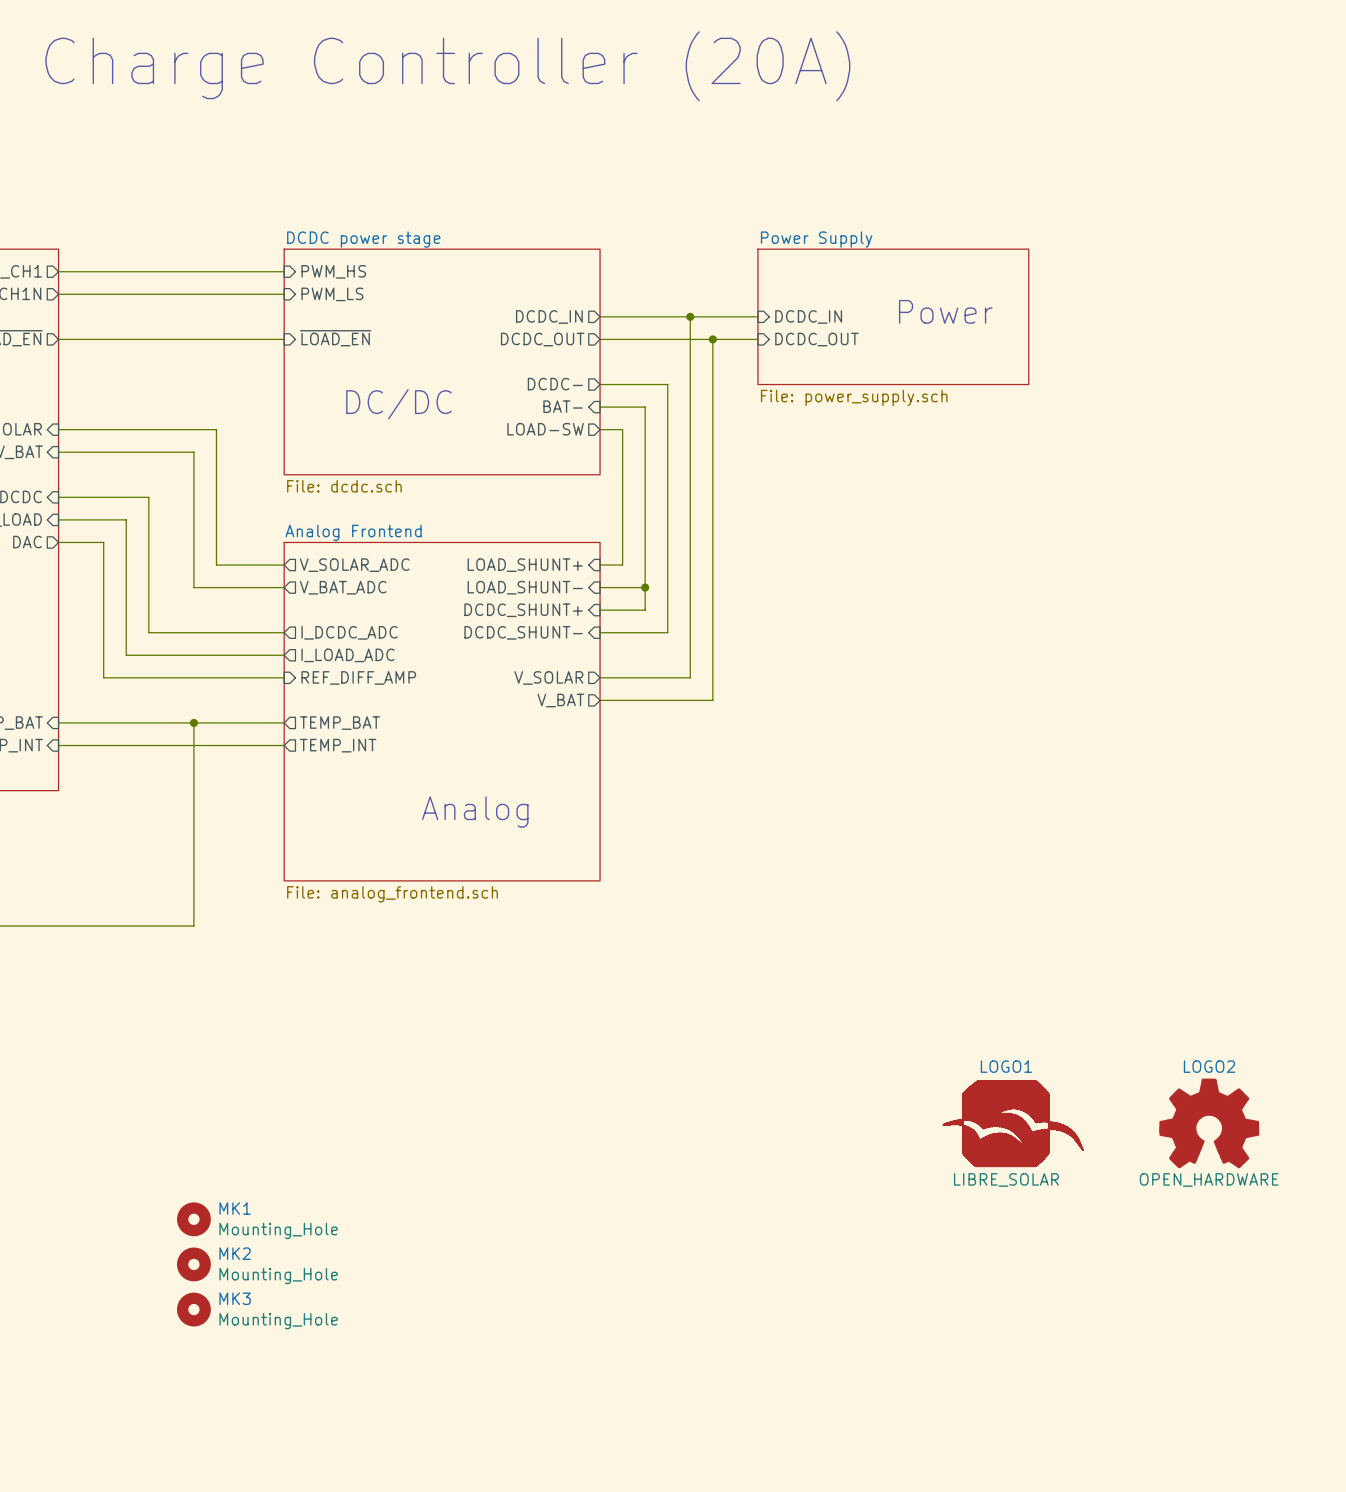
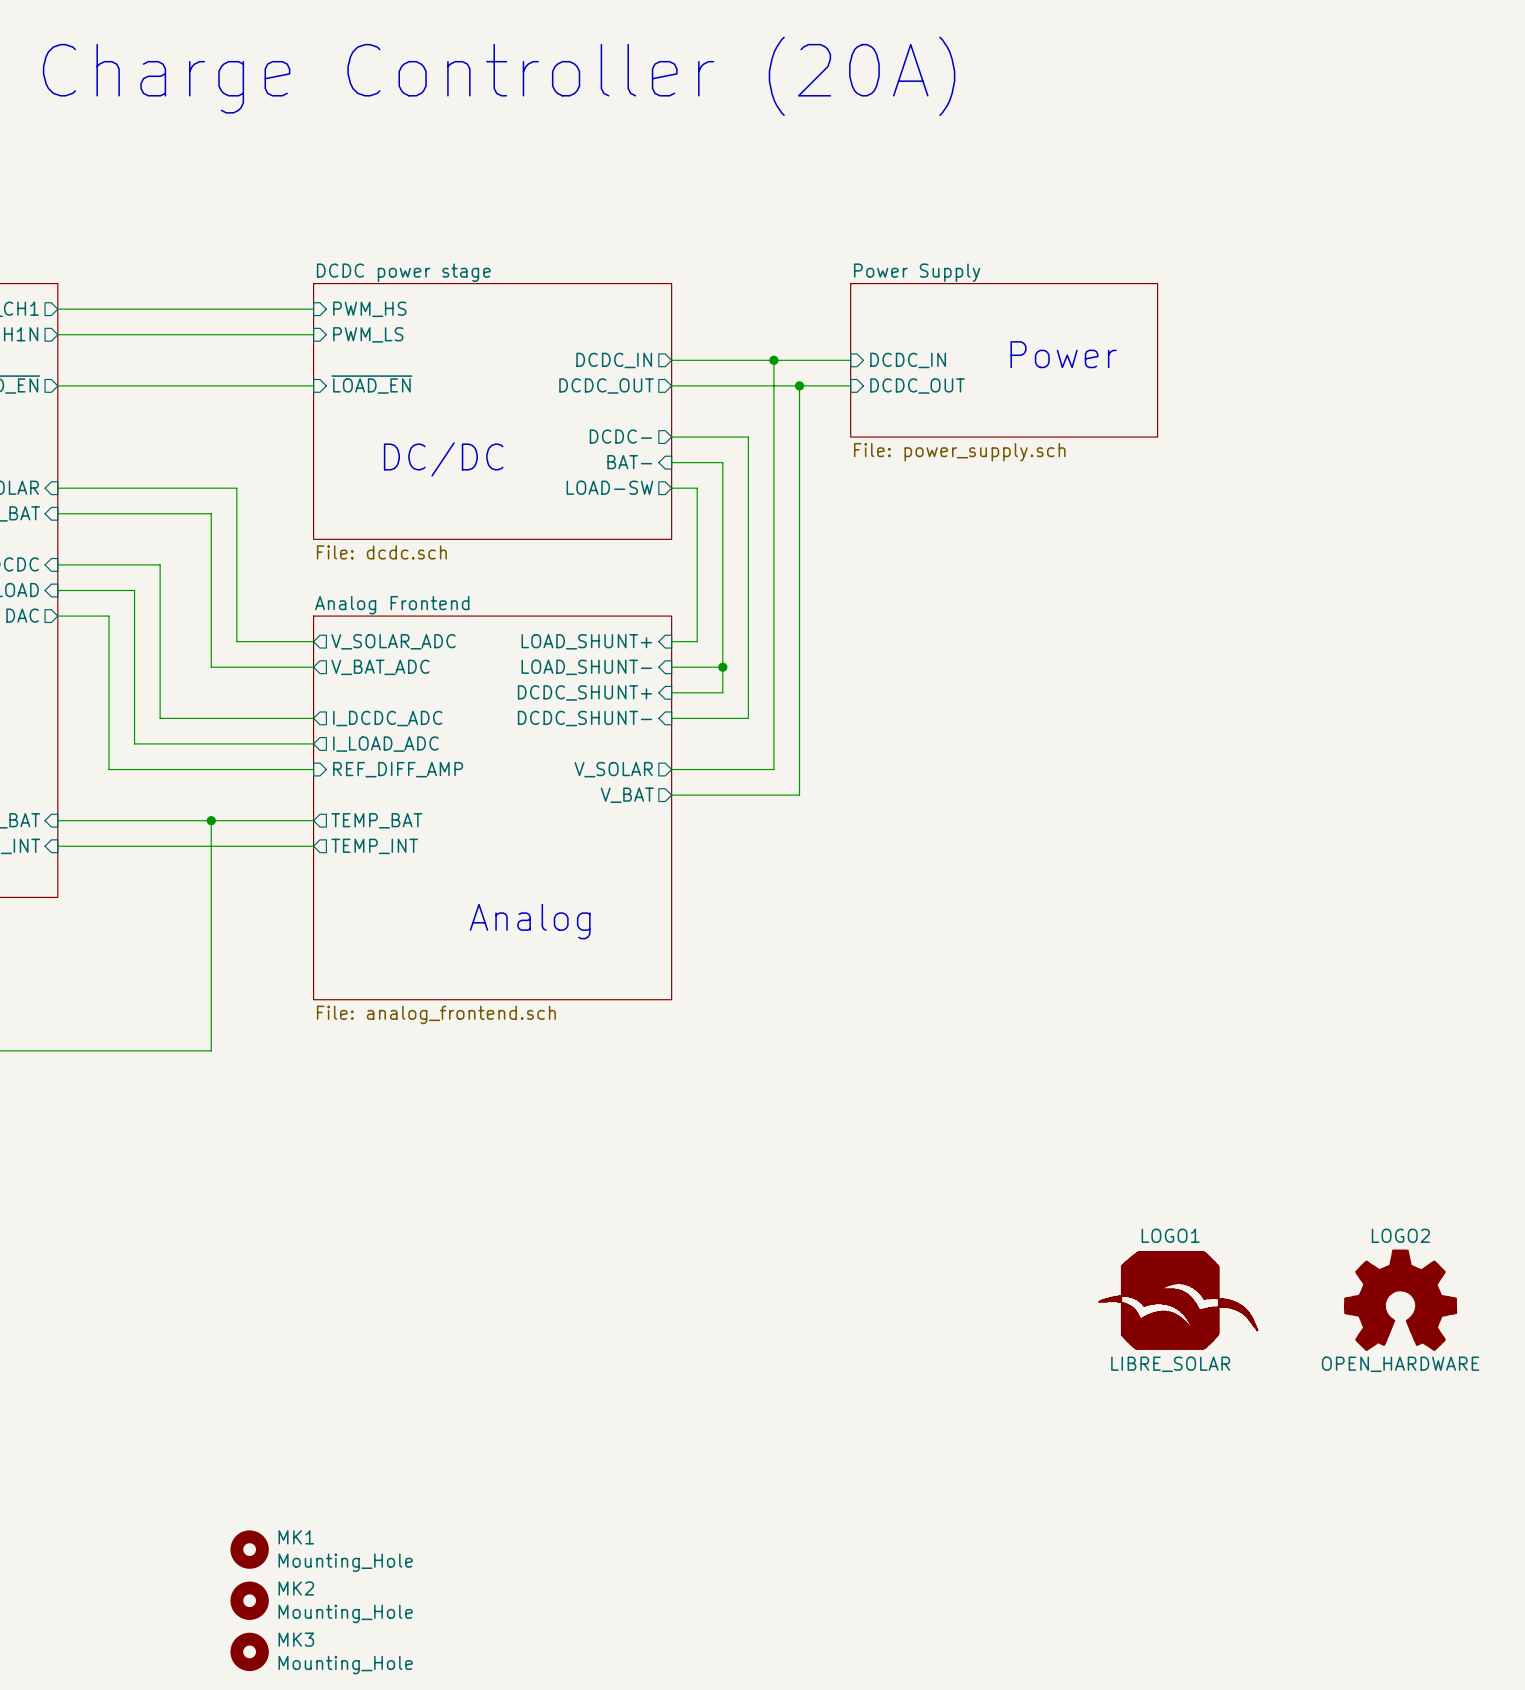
LOGO1 position: (1013, 1123) -> (1178, 1300)
LOGO2 position: (1209, 1123) -> (1400, 1300)
MK1 position: (193, 1219) -> (249, 1549)
MK2 position: (193, 1264) -> (249, 1600)
MK3 position: (193, 1309) -> (249, 1651)

